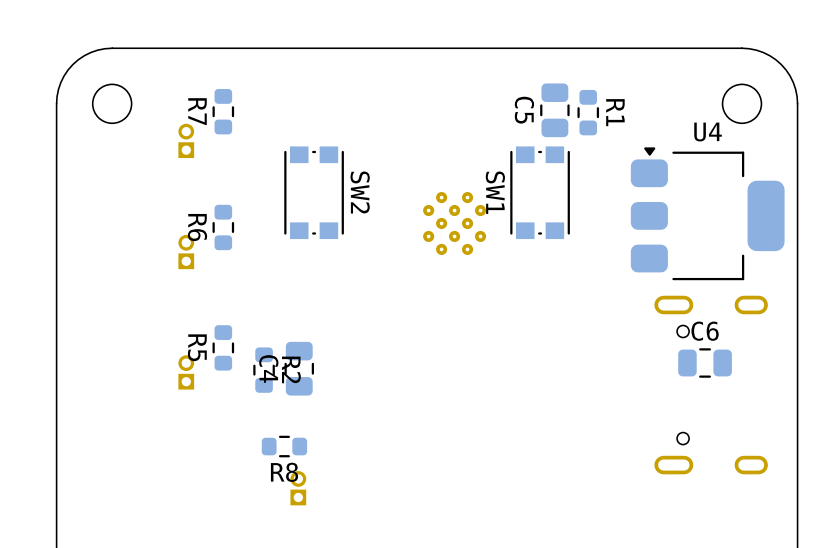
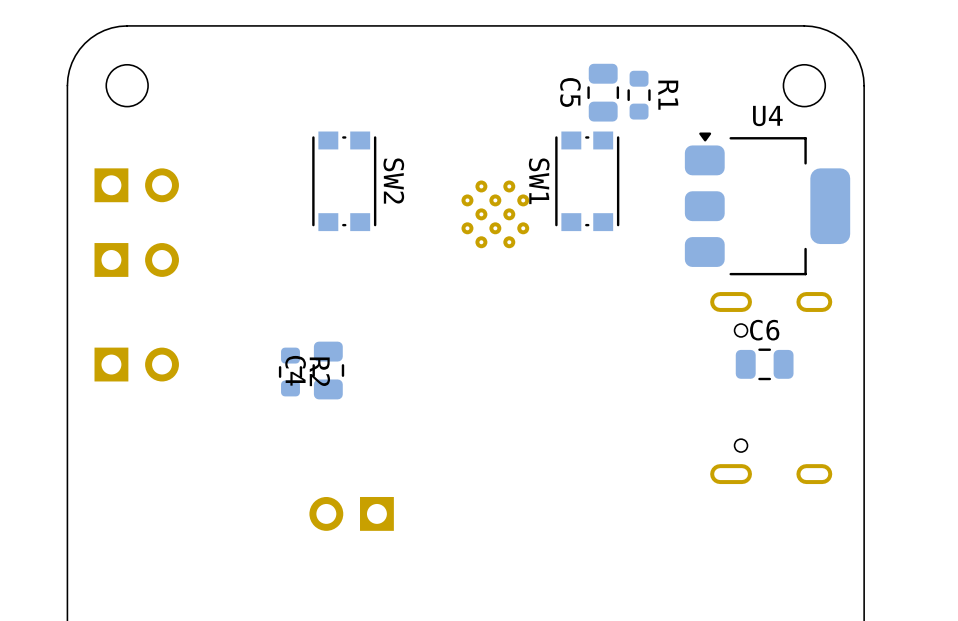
R7: (223, 111) -> none
part: (186, 140) -> none
part: none -> (136, 185)
R6: (223, 227) -> none
part: (186, 252) -> none
part: none -> (136, 259)
R5: (223, 347) -> none
part: none -> (136, 364)
part: (186, 372) -> none
R8: (284, 446) -> none
part: (298, 488) -> none
part: none -> (351, 513)

